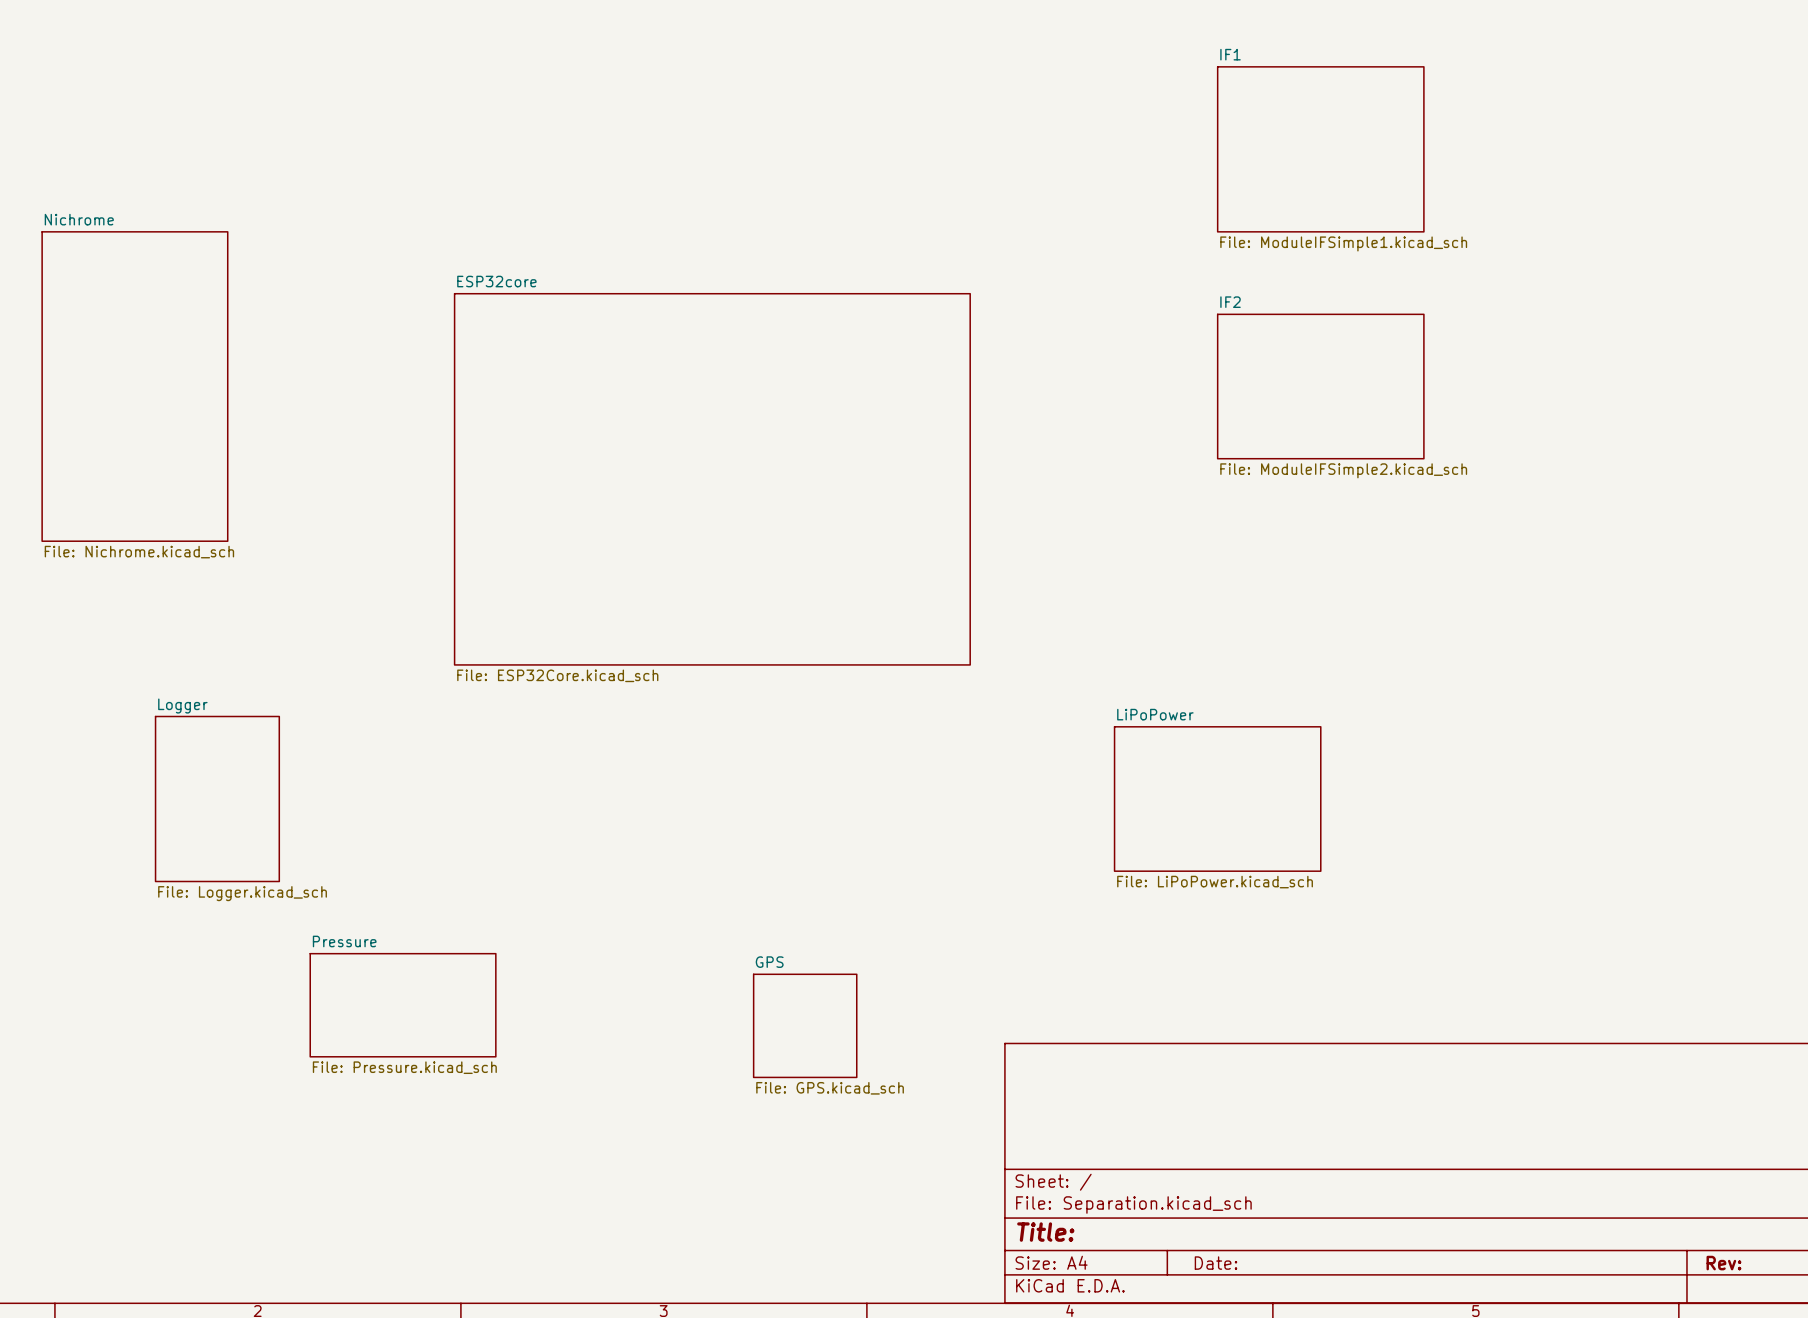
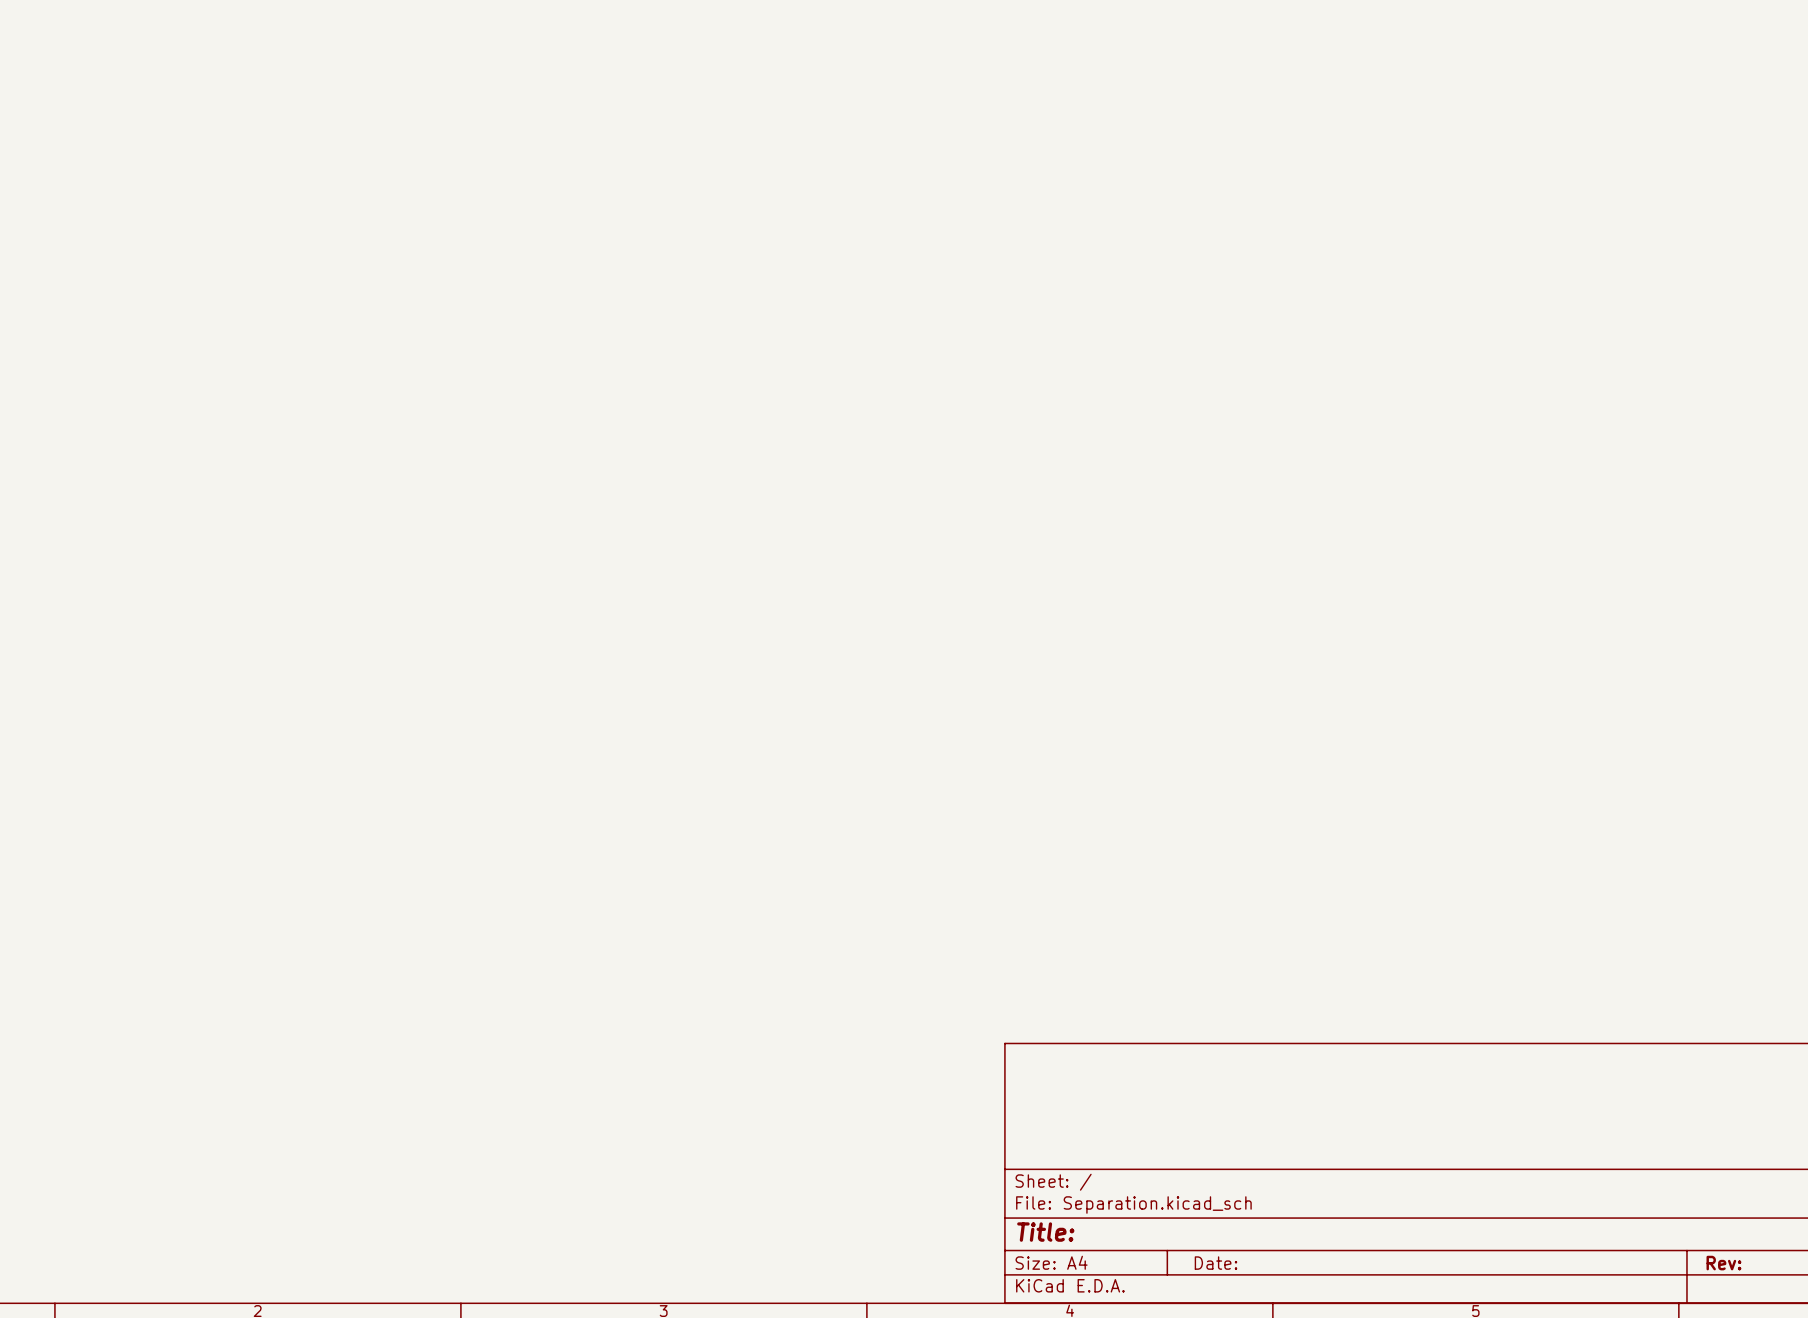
sheet IF1: File: ModuleIFSimple1.kicad_sch (1320, 149) -> none
sheet Nichrome: File: Nichrome.kicad_sch (134, 386) -> none
sheet IF2: File: ModuleIFSimple2.kicad_sch (1320, 386) -> none
sheet ESP32core: File: ESP32Core.kicad_sch (712, 479) -> none
sheet Logger: File: Logger.kicad_sch (217, 799) -> none
sheet LiPoPower: File: LiPoPower.kicad_sch (1217, 799) -> none
sheet Pressure: File: Pressure.kicad_sch (403, 1005) -> none
sheet GPS: File: GPS.kicad_sch (805, 1025) -> none

